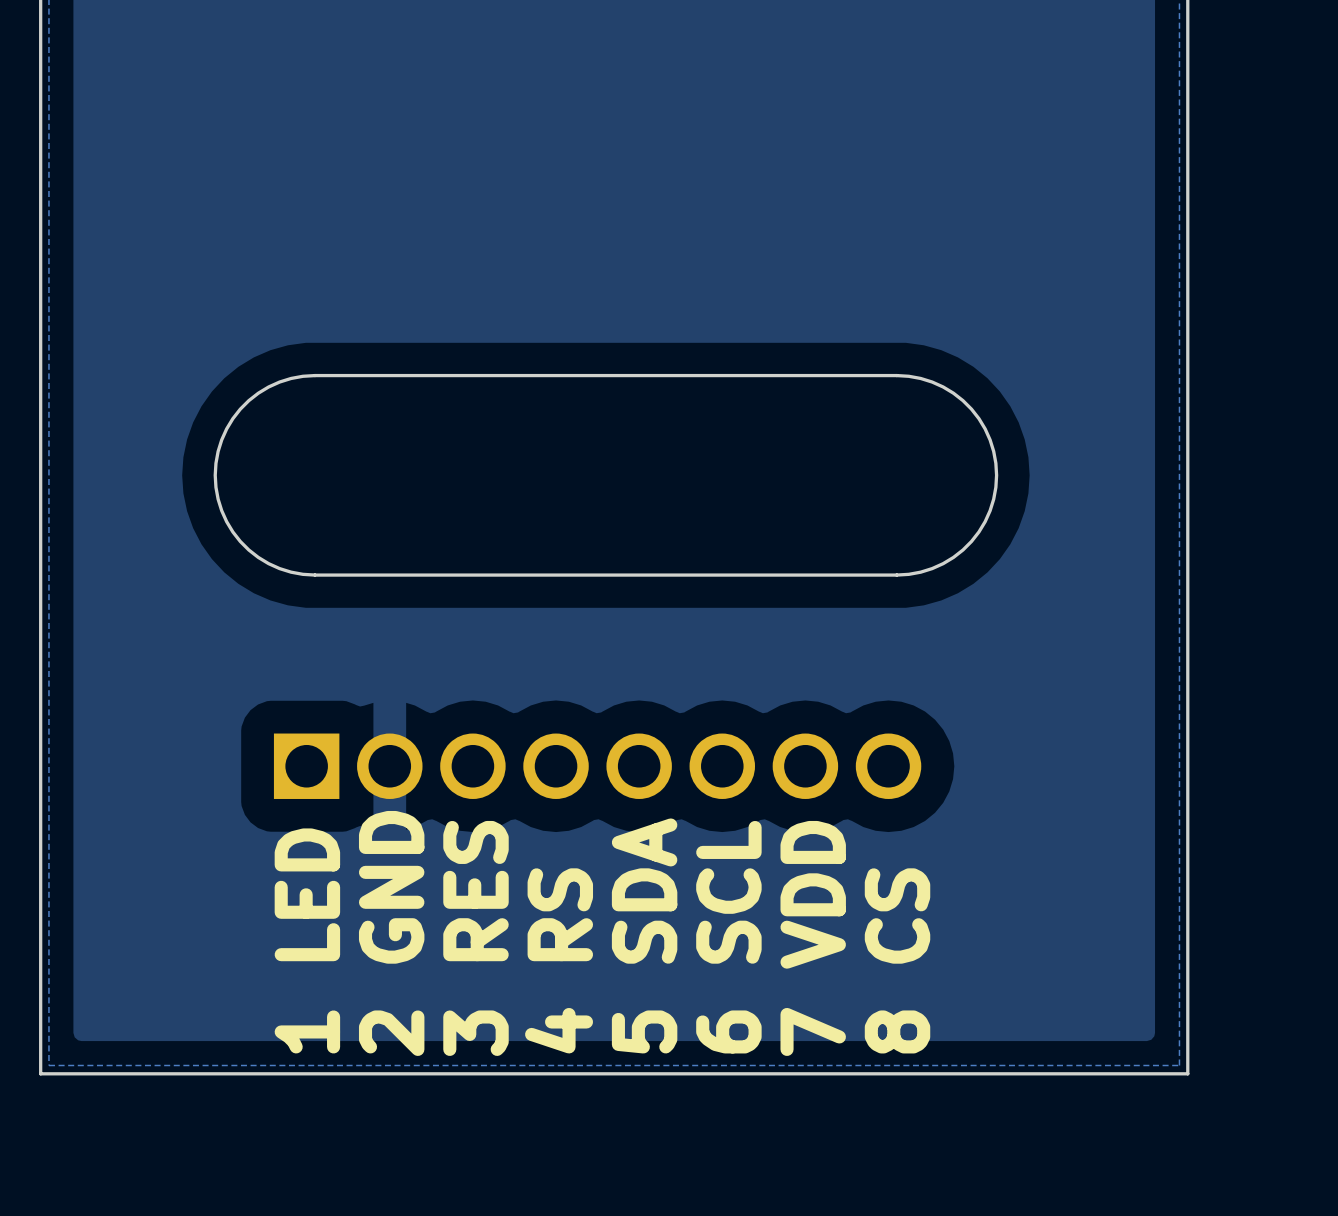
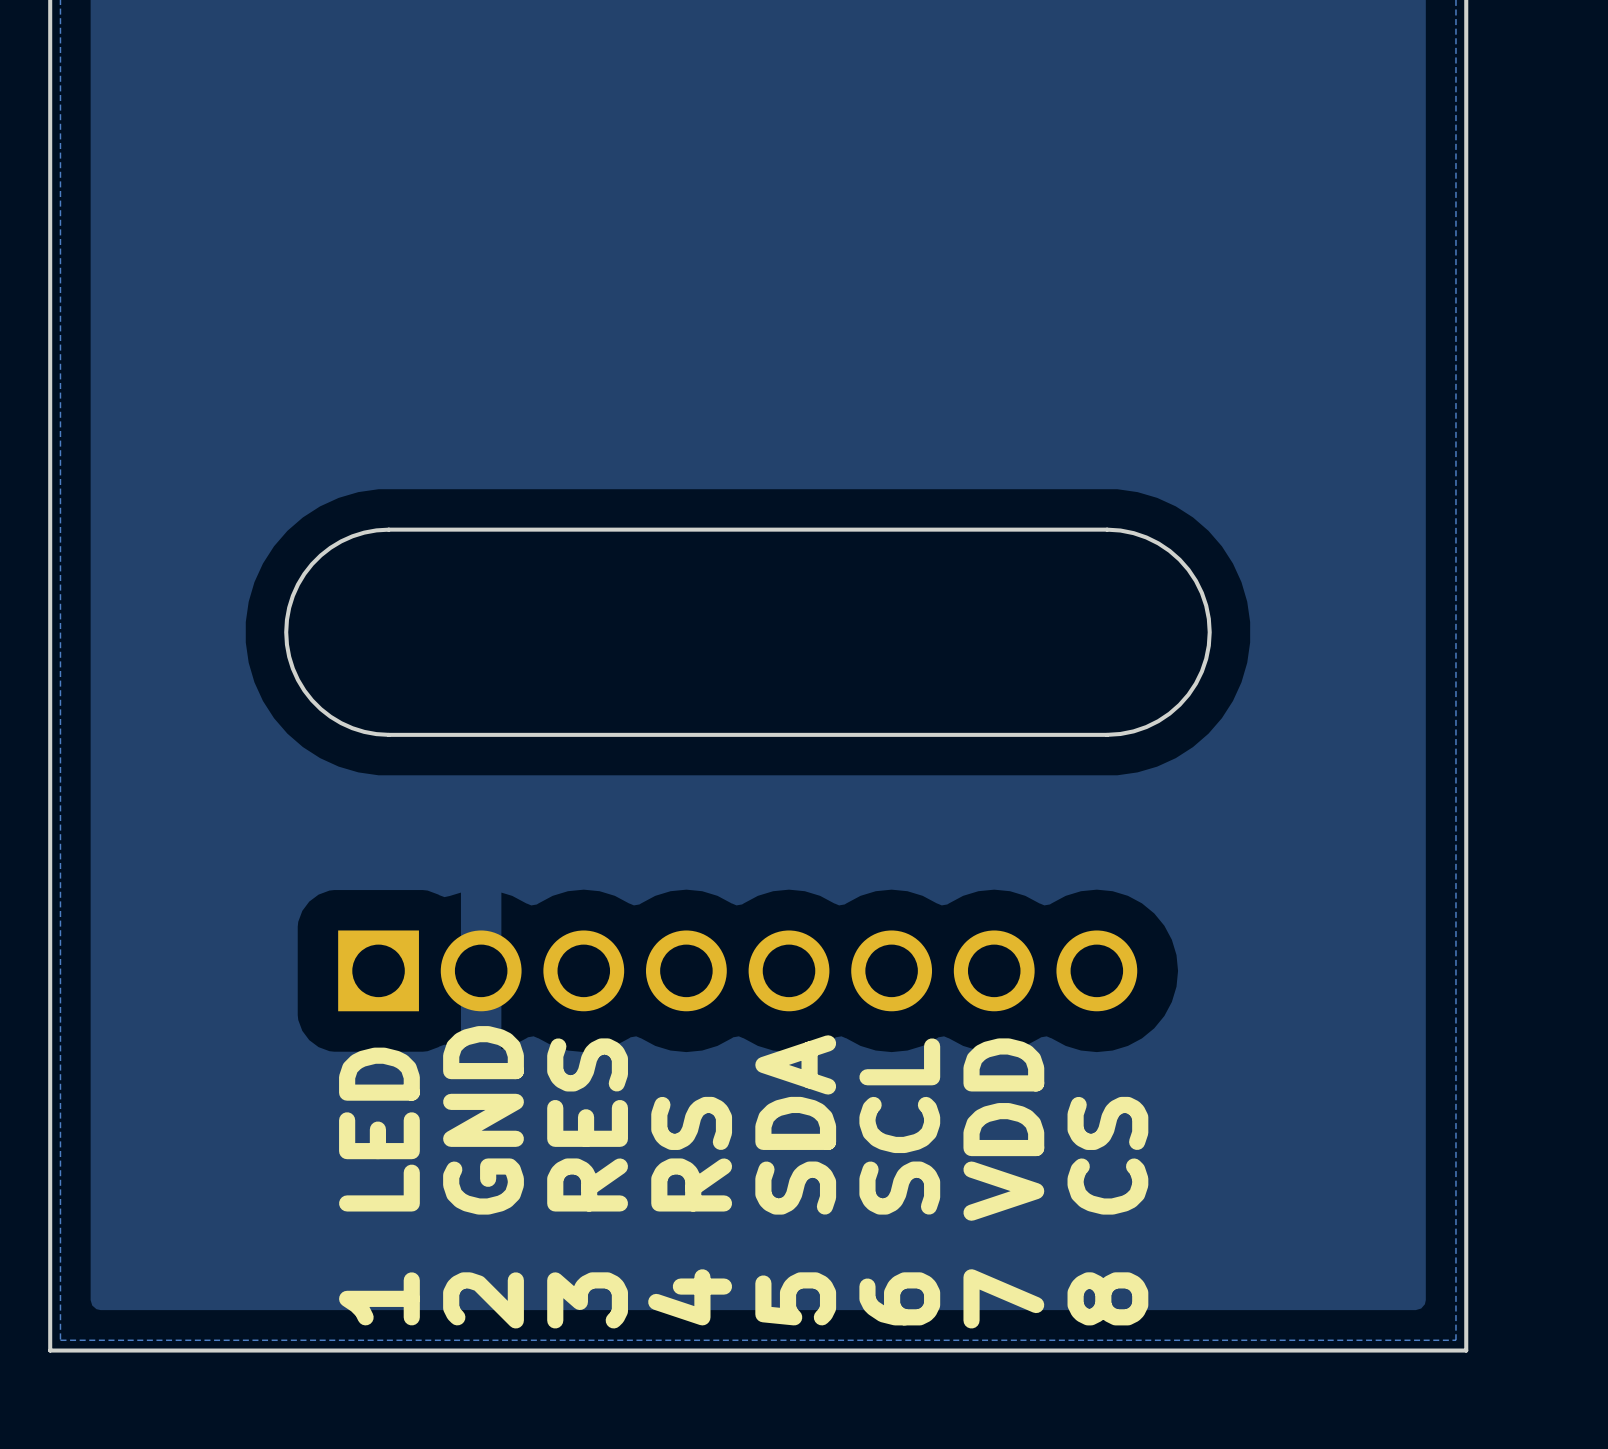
board edge: (896, 575) (932, 568) (962, 549) (985, 521) (993, 499) (996, 475) (993, 451) (985, 428) (962, 400) (932, 382) (896, 375) (314, 375) (279, 382) (248, 400) (226, 428) (215, 463) (218, 499) (232, 531) (258, 557) (291, 572) (314, 575) -> (1107, 734) (1133, 731) (1146, 727) (1158, 721) (1179, 704) (1195, 683) (1201, 671) (1206, 658) (1209, 632) (1206, 605) (1201, 592) (1195, 580) (1179, 559) (1158, 543) (1146, 537) (1120, 530) (1107, 529) (388, 529) (364, 532) (330, 547) (304, 573) (289, 607) (286, 644) (297, 679) (320, 709) (352, 728) (388, 734)

